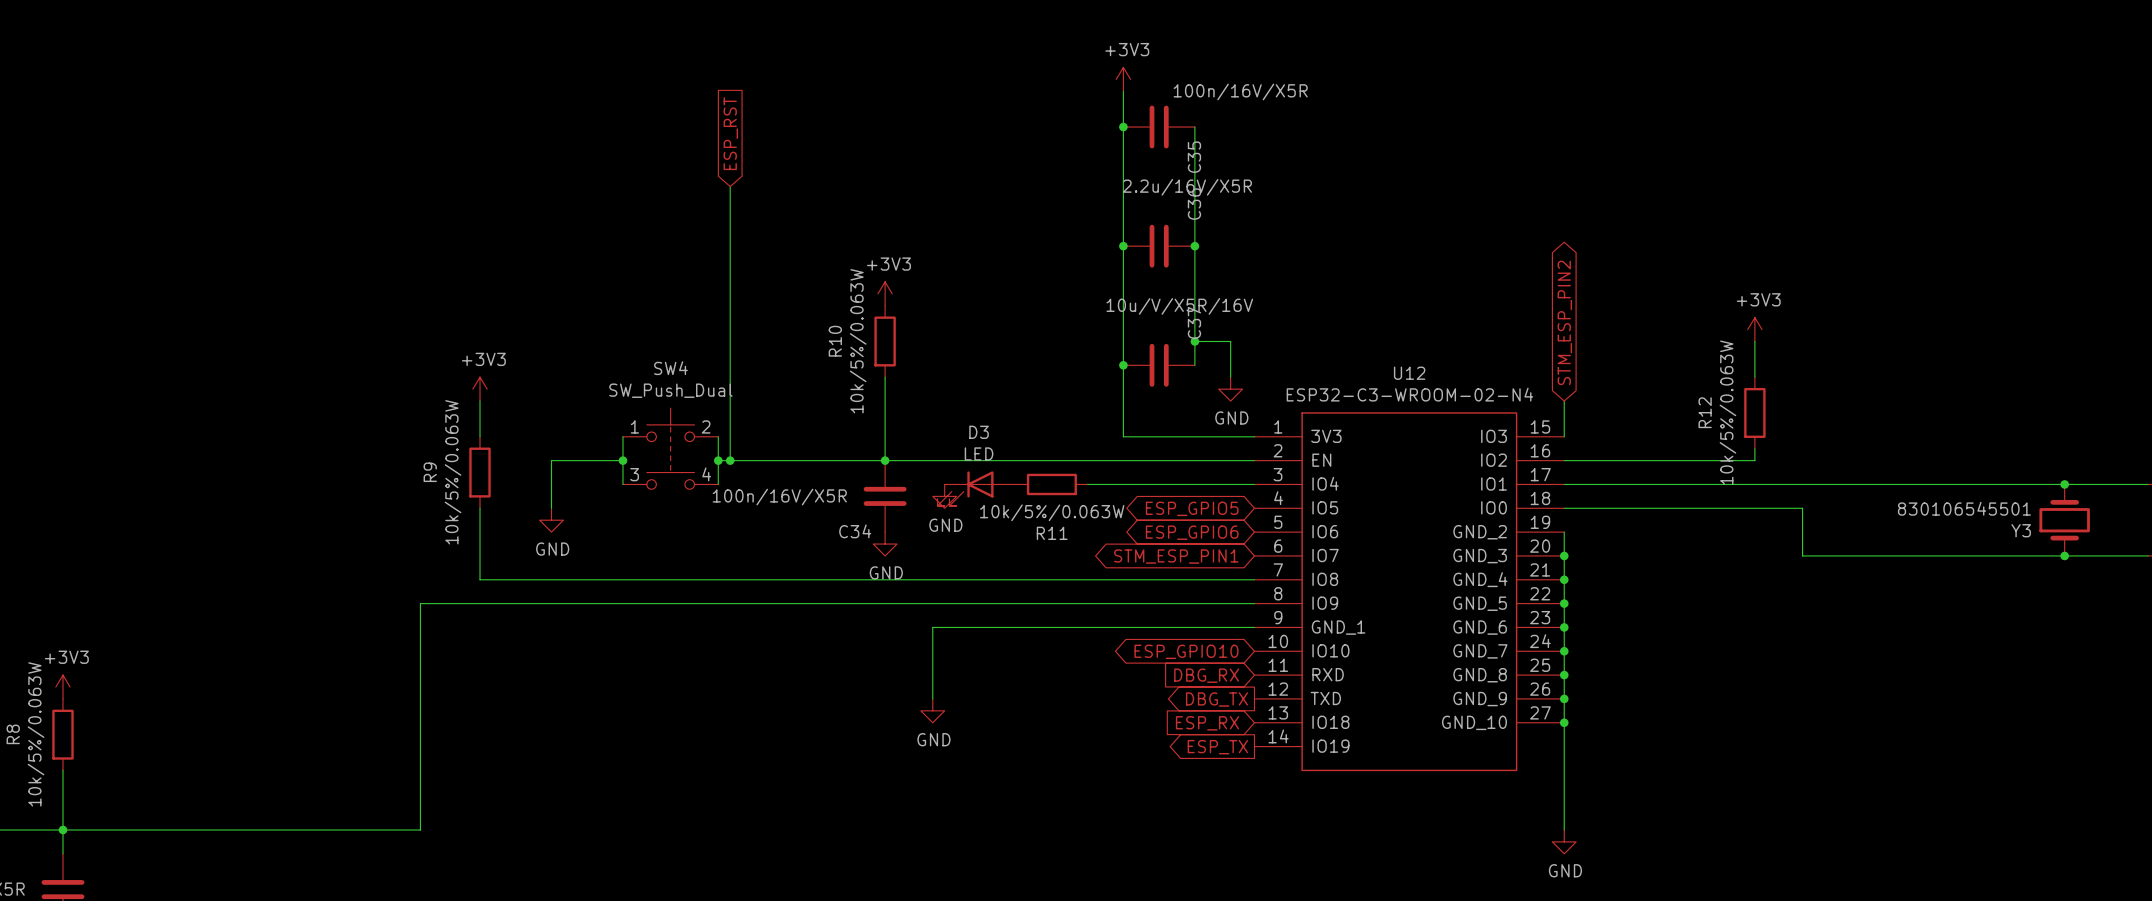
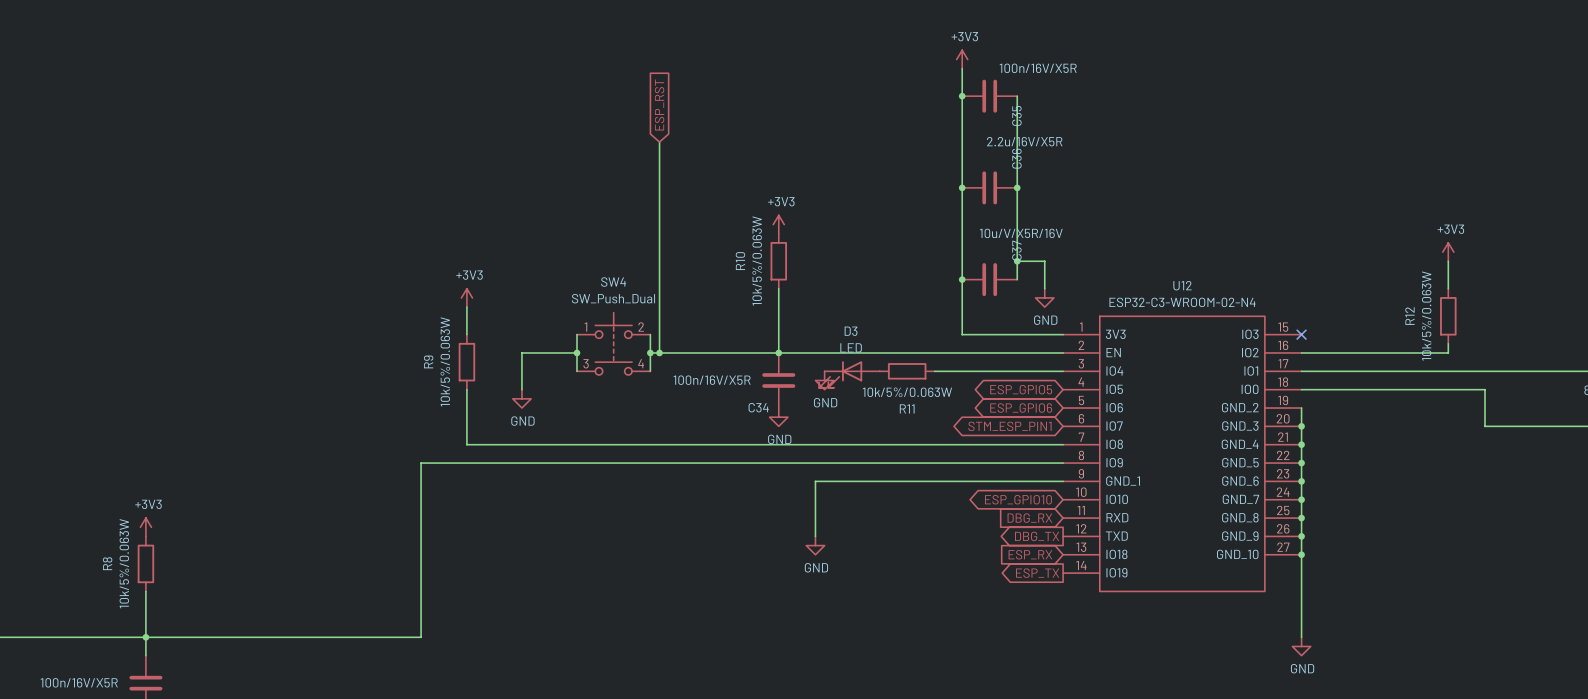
global label: STM_ESP_PIN2 (1564, 322) -> none
wire: (1564, 401) (1564, 436) -> none
no-connect mark: none -> (1301, 334)

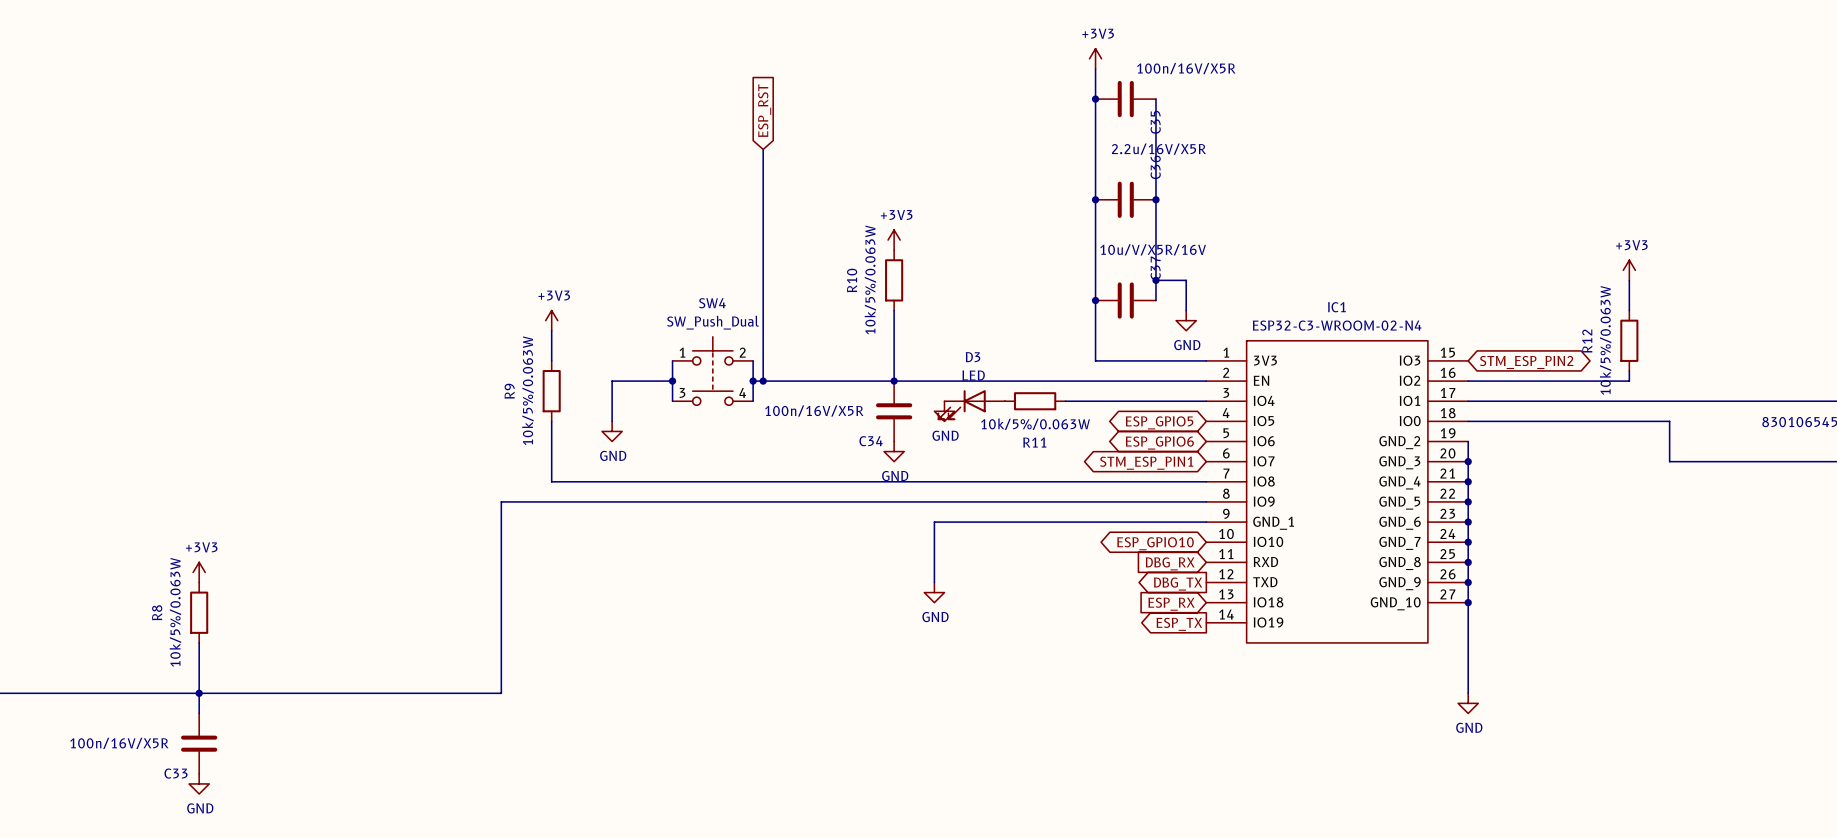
U12 name: U12 (1182, 285) -> IC1 (1336, 307)
no-connect mark: (1301, 334) -> none
global label: none -> STM_ESP_PIN2 (1526, 362)

